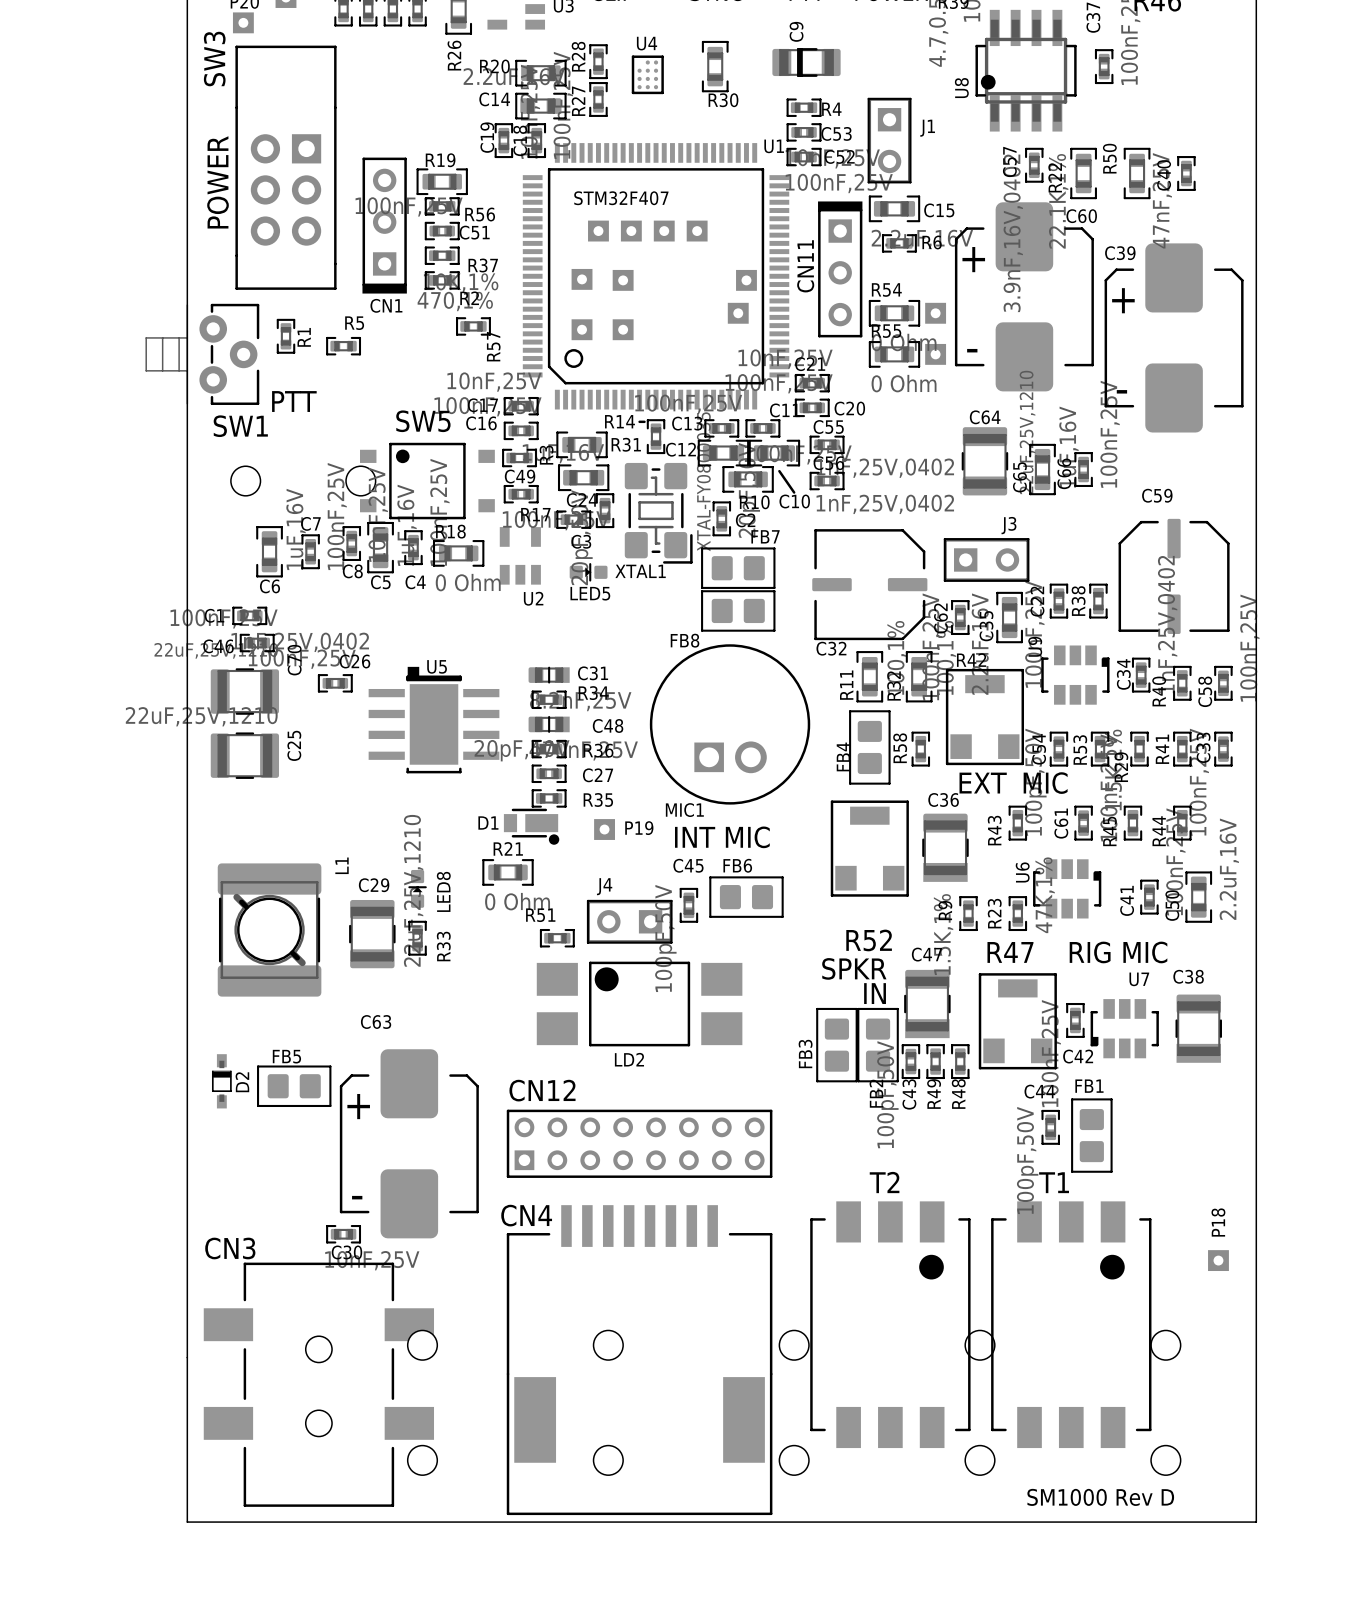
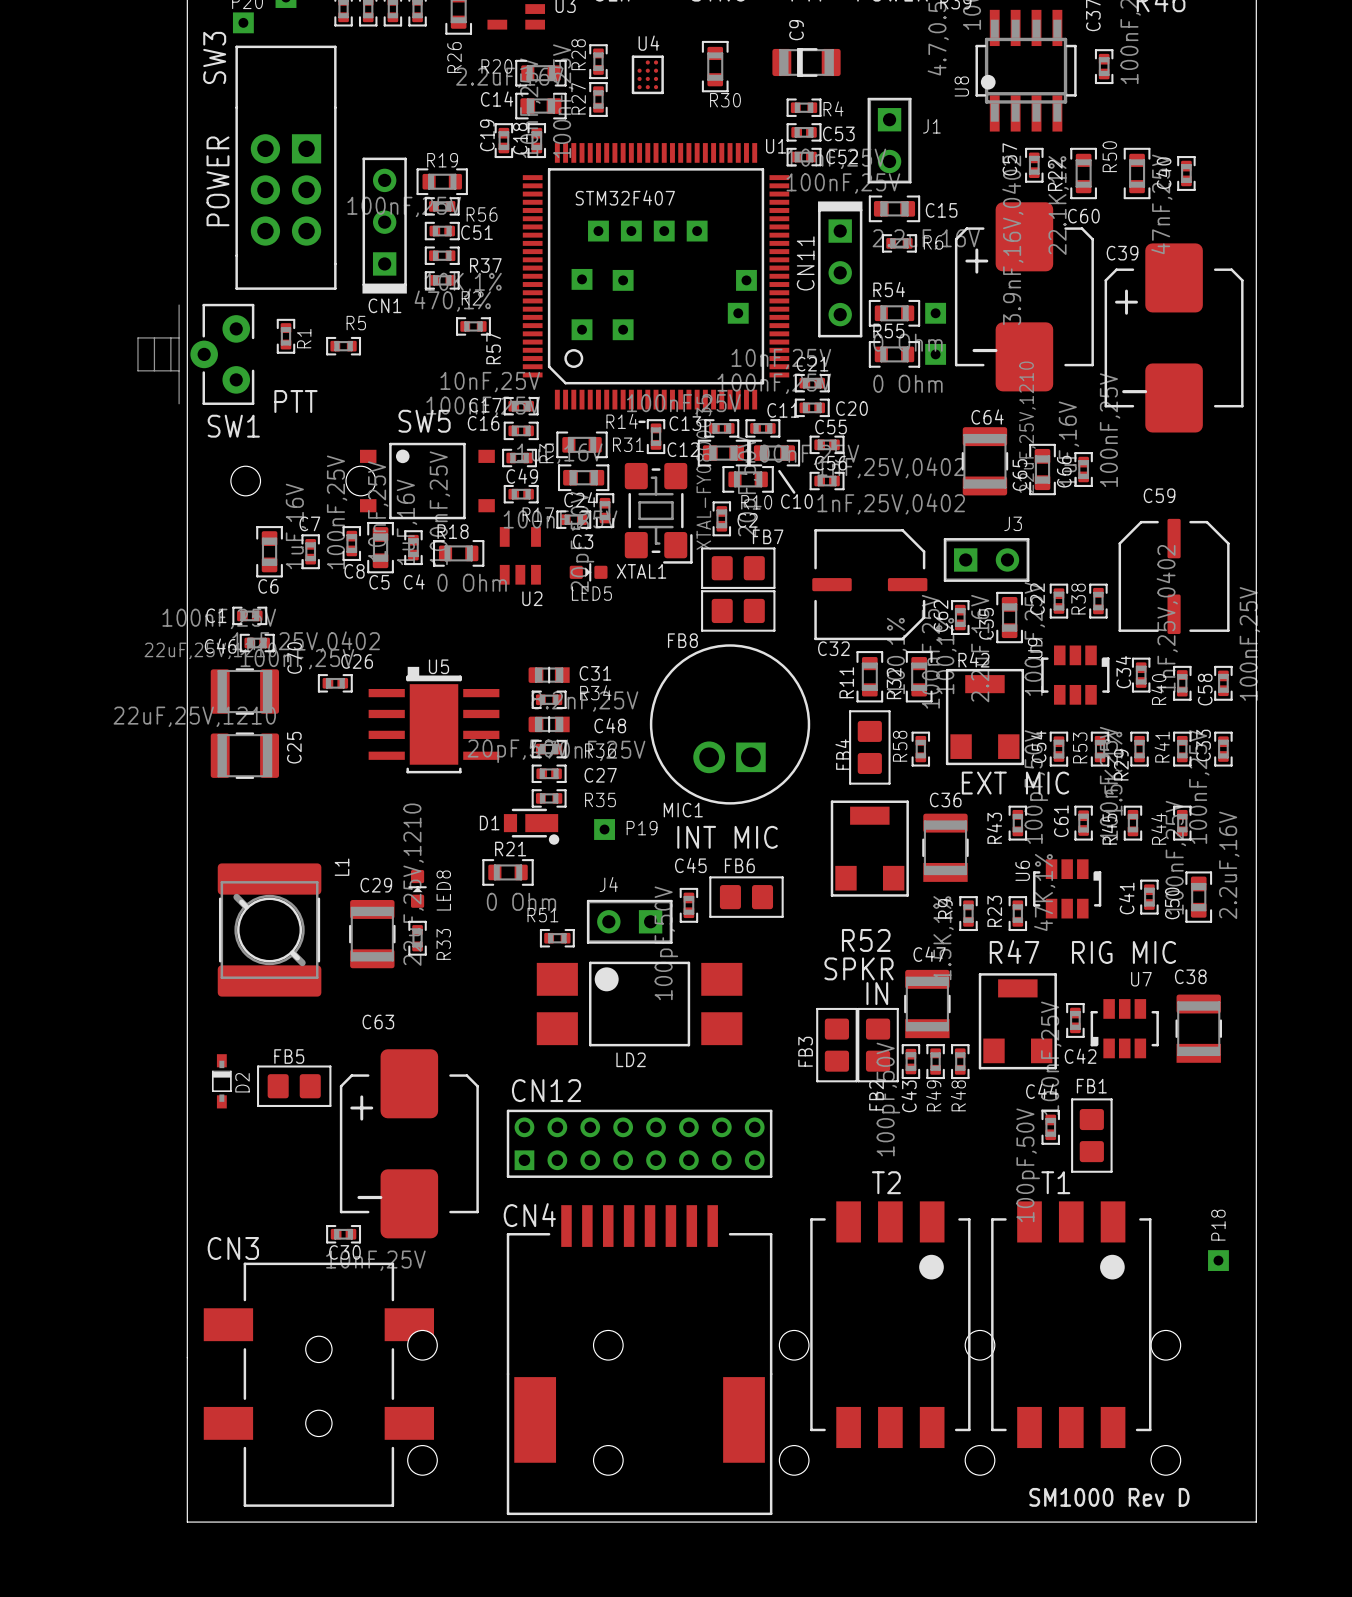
SW1 footprint: [145, 303, 260, 405] -> [137, 303, 255, 405]
MIC1 footprint: [649, 644, 811, 805] -> [649, 644, 811, 805]

